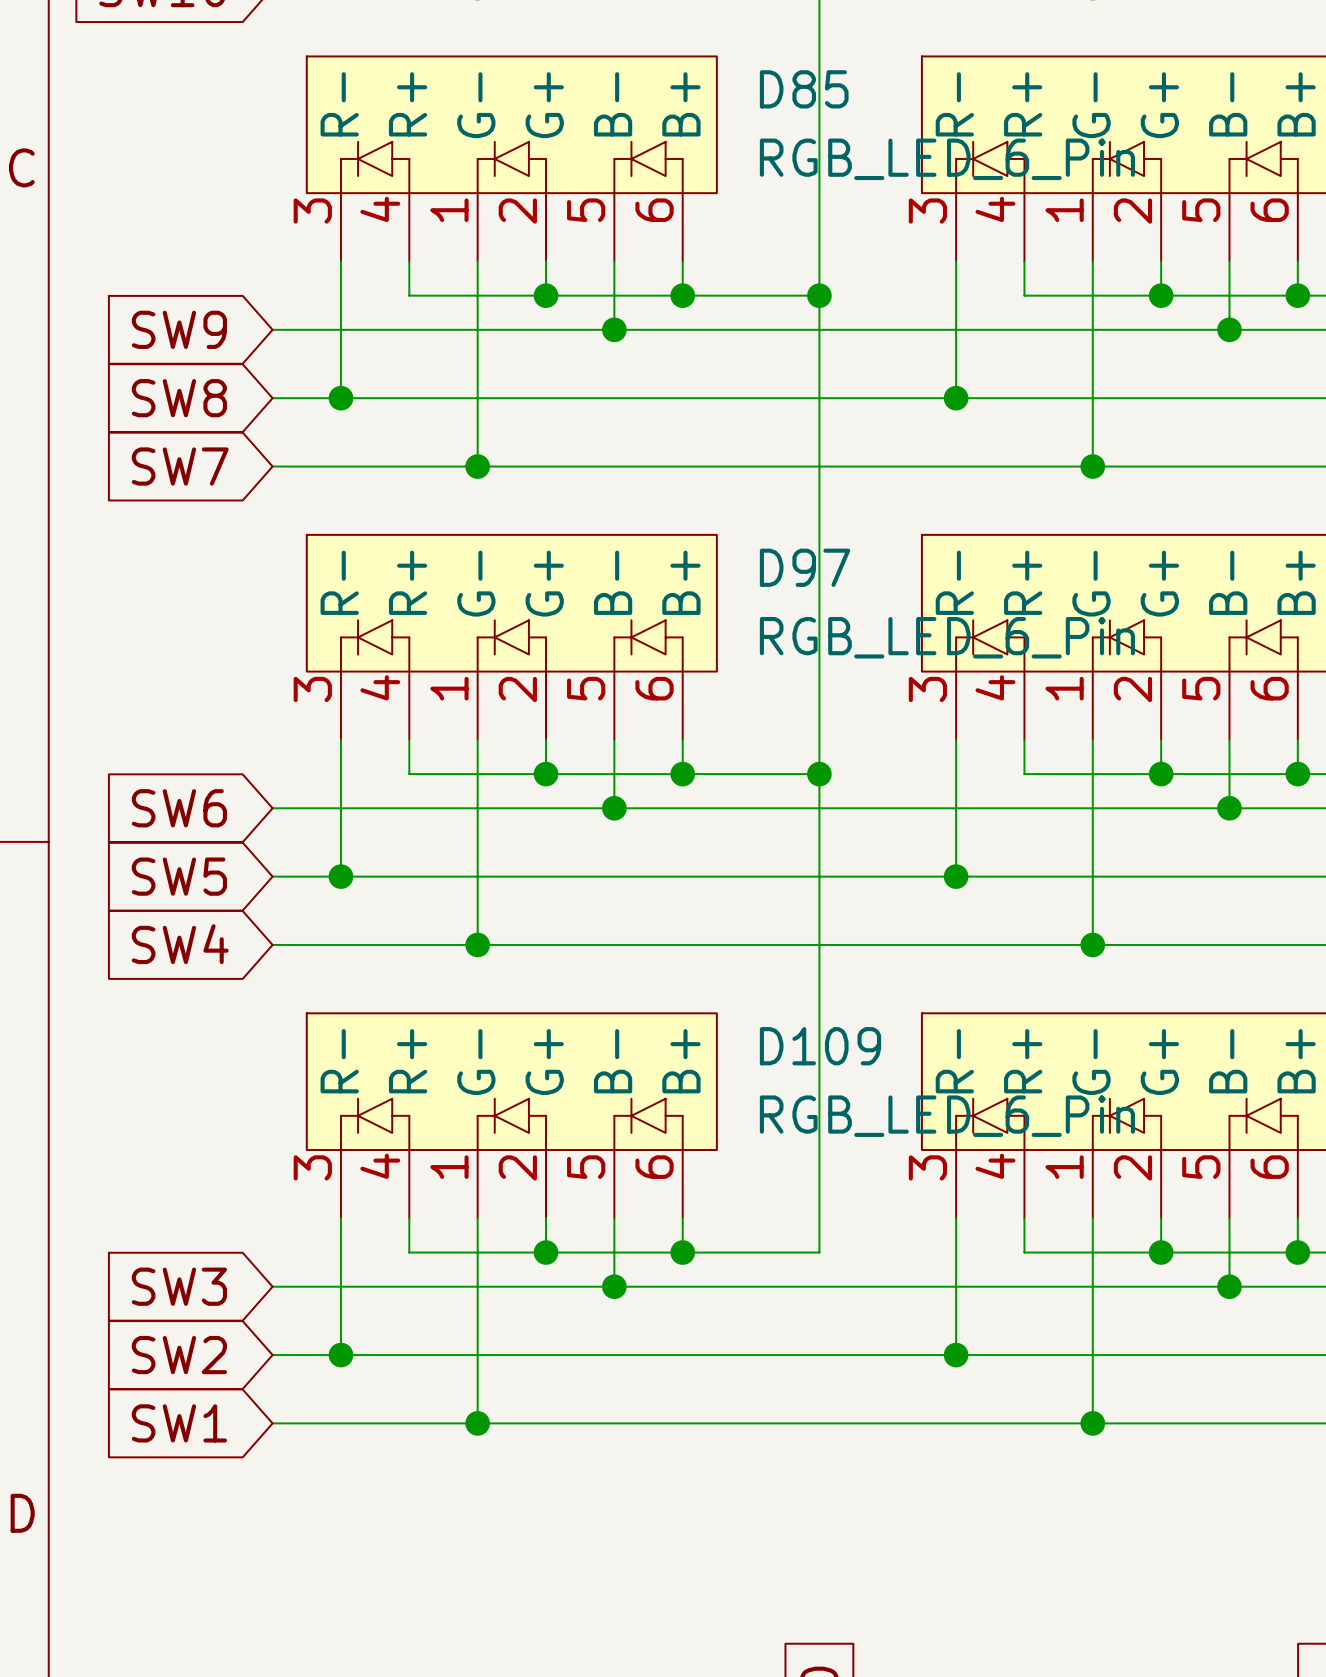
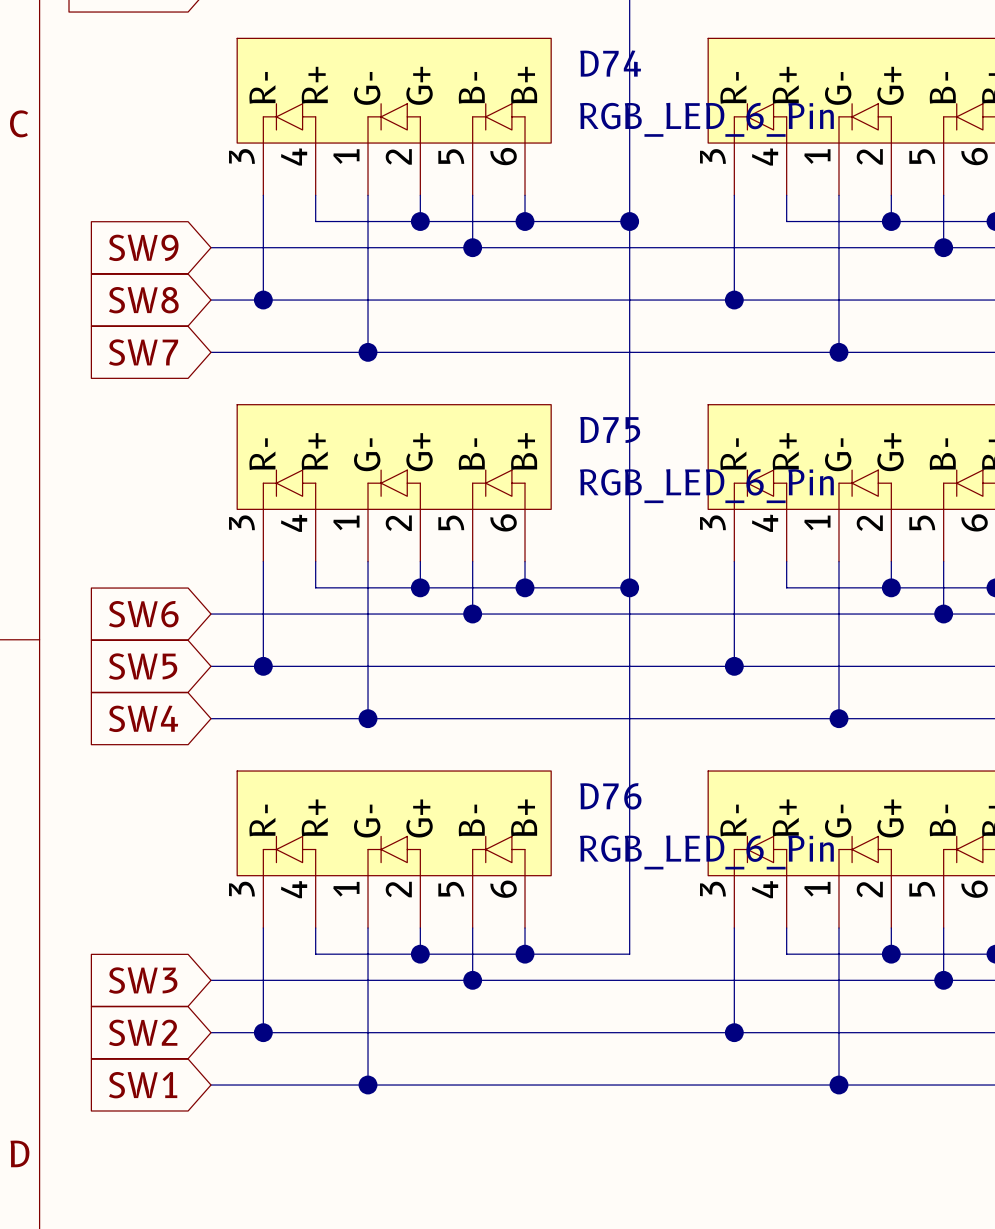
D85 name: D85 (804, 89) -> D74 (610, 63)
D97 name: D97 (805, 567) -> D75 (610, 429)
D109 name: D109 (820, 1046) -> D76 (610, 796)

